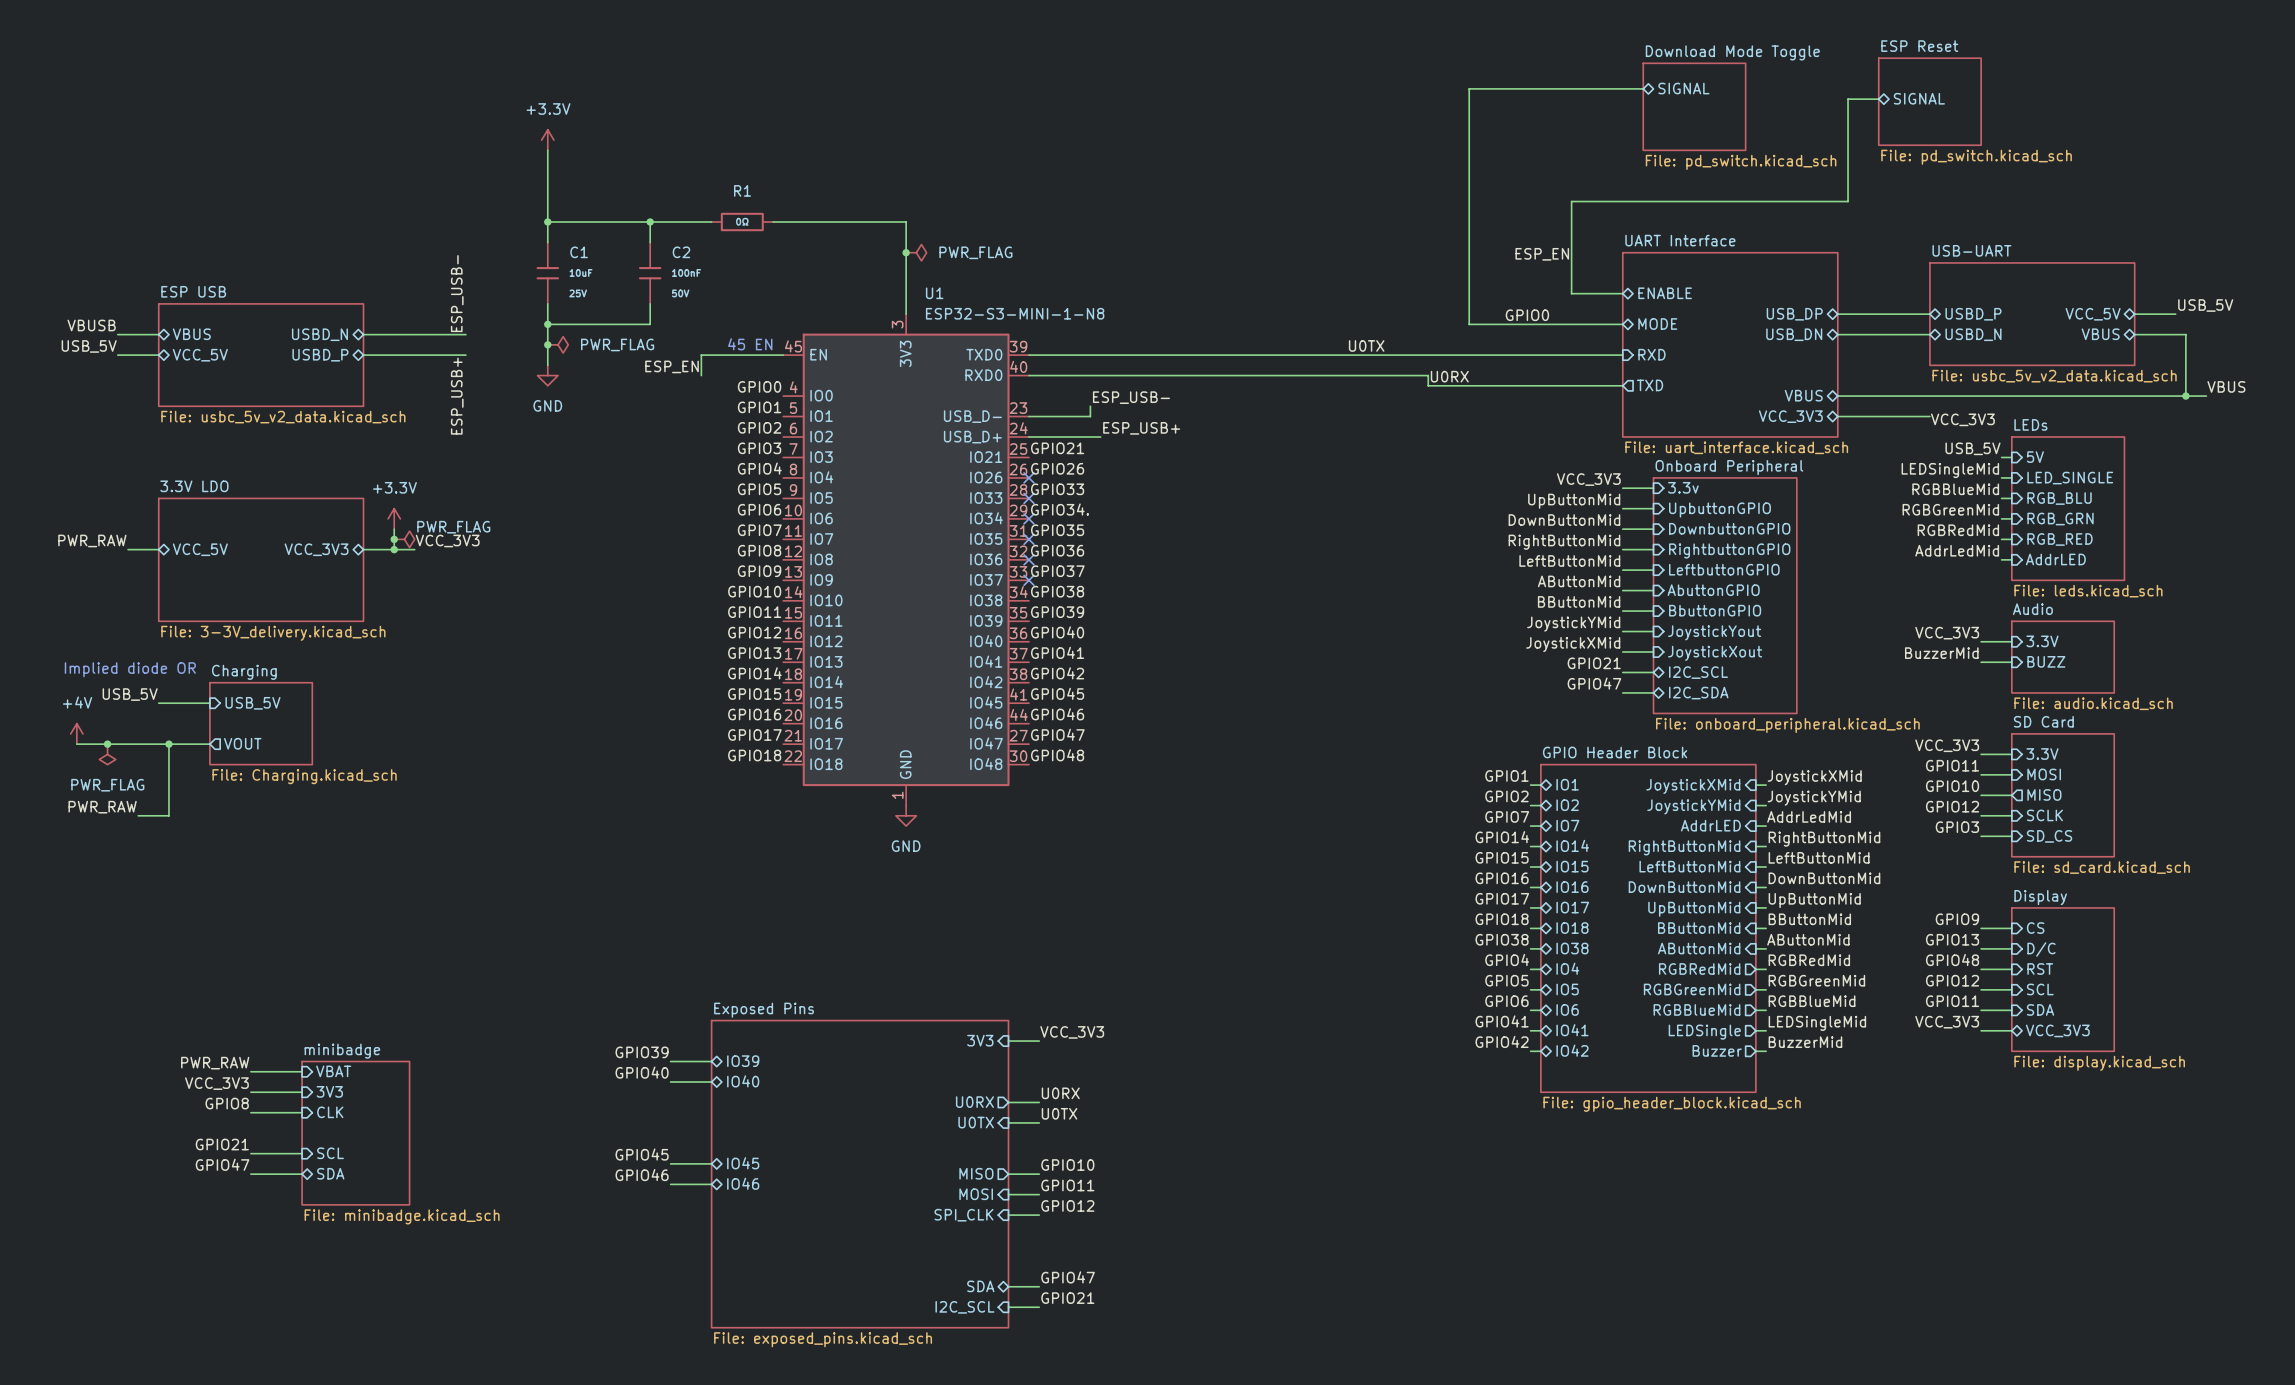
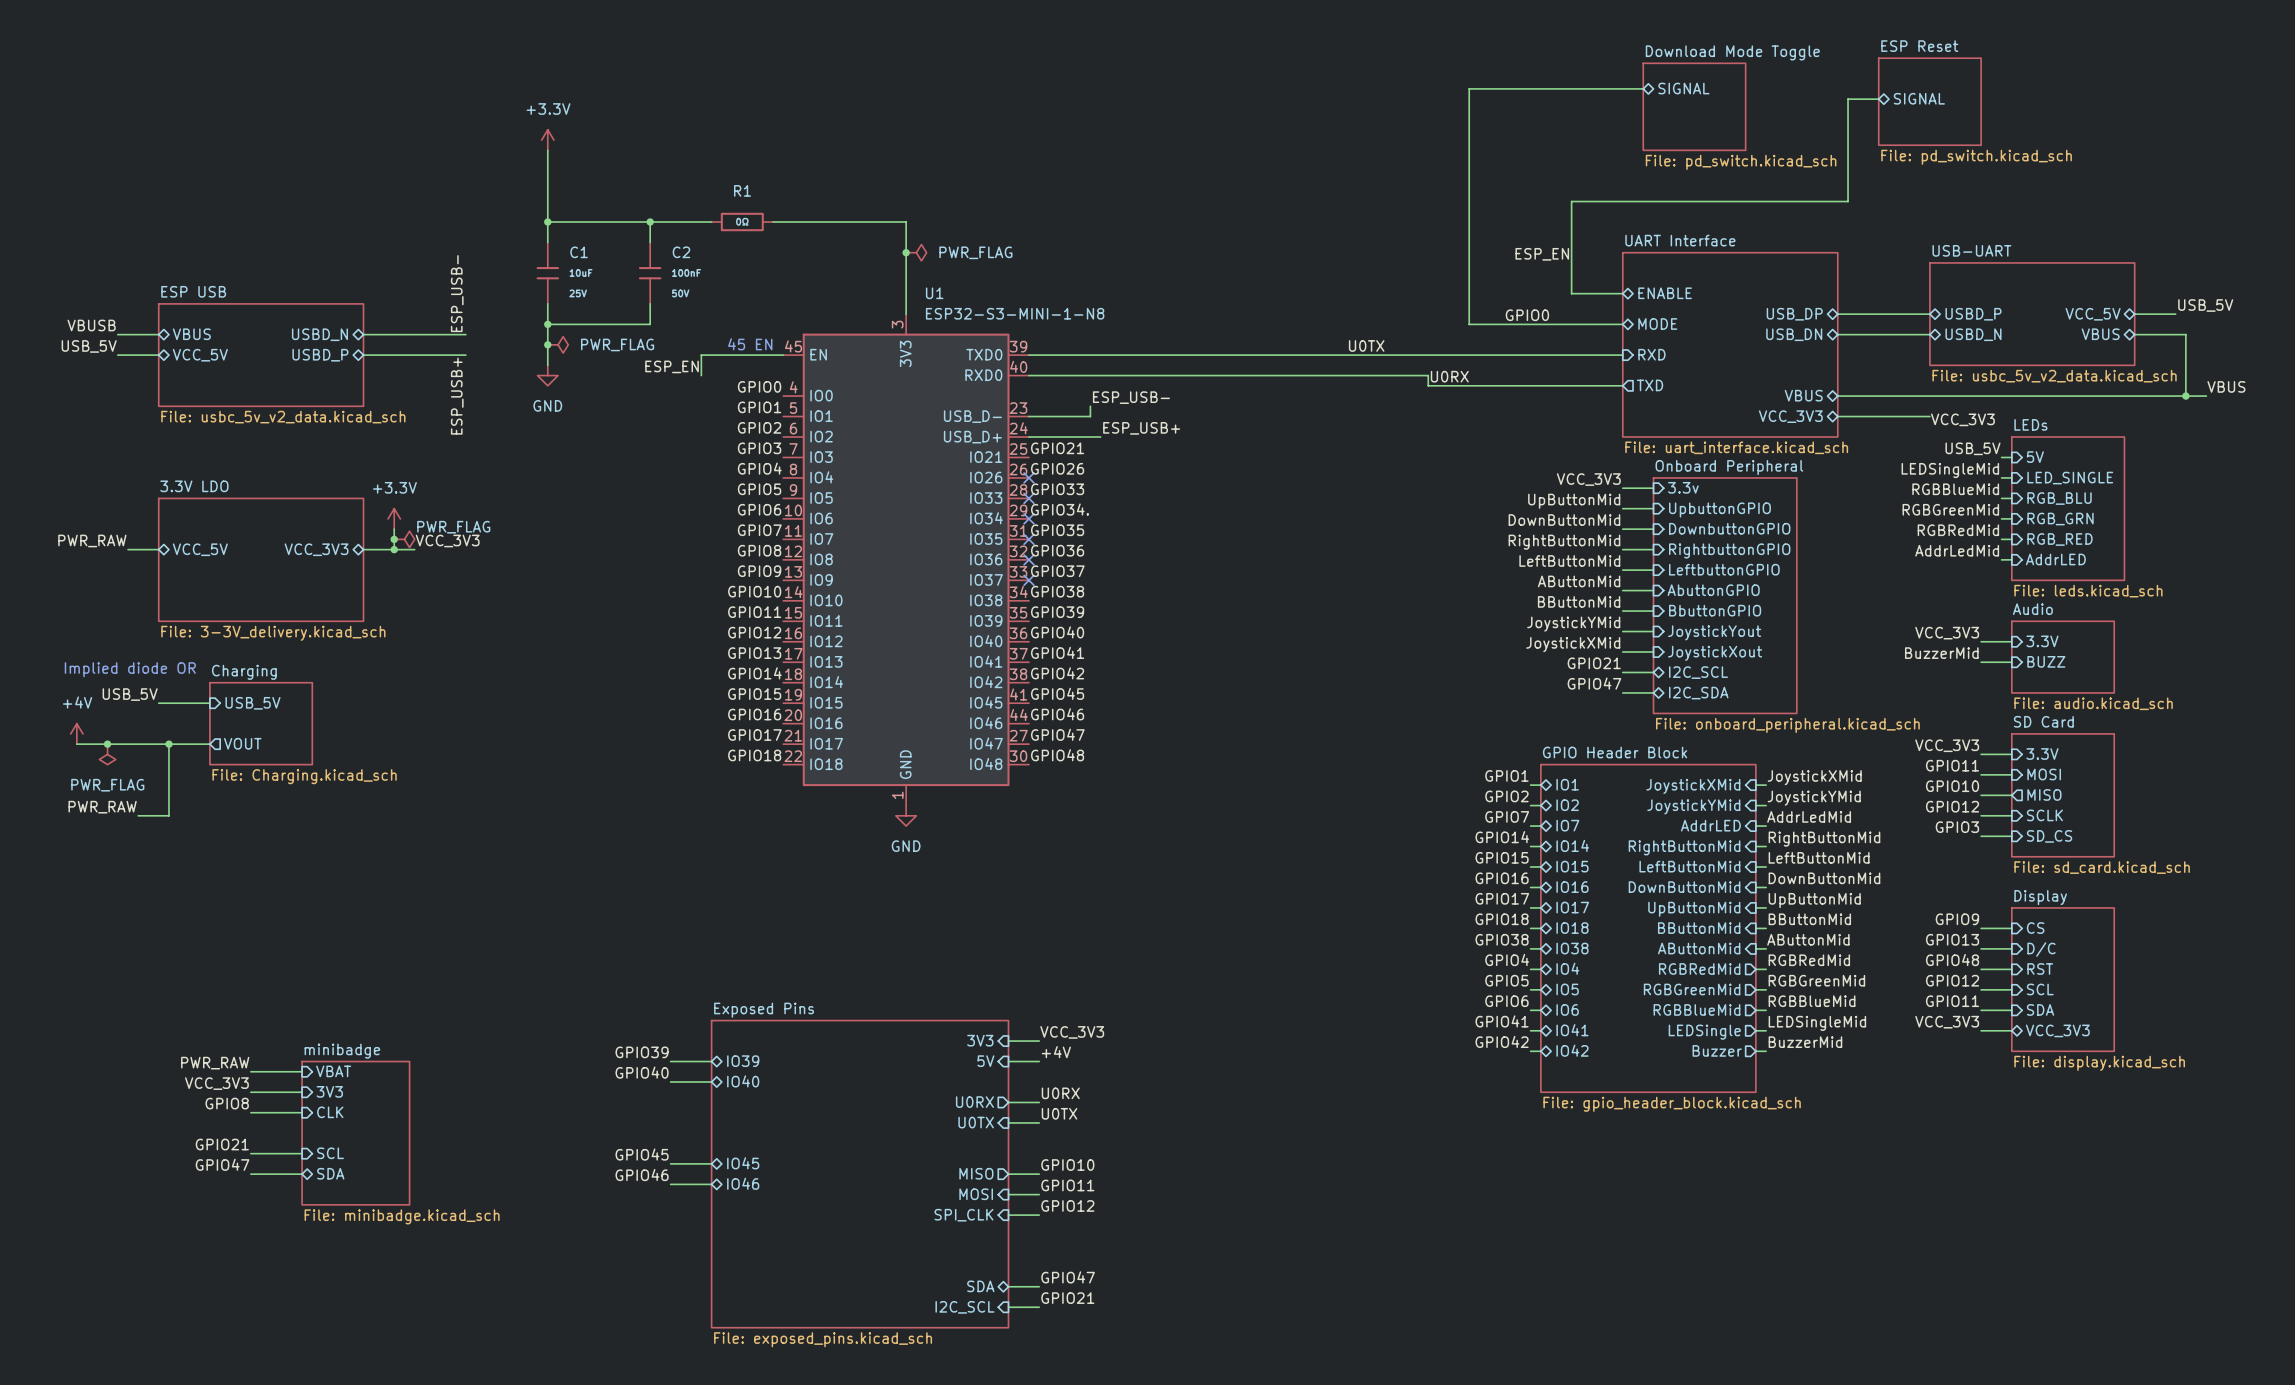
label: none -> +4V (1056, 1052)
sheet pin: none -> 5V (985, 1061)
wire: none -> (1008, 1061) (1039, 1061)

